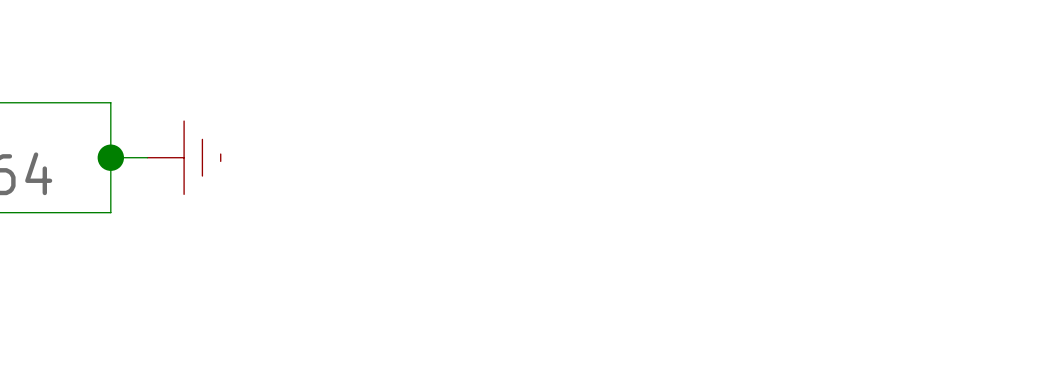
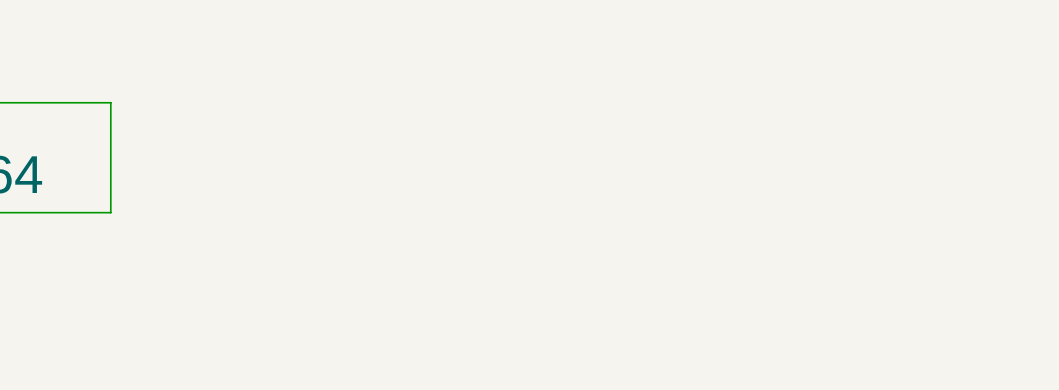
wire: (110, 157) (147, 157) -> none
junction: (110, 157) -> none
power symbol: (184, 157) -> none

